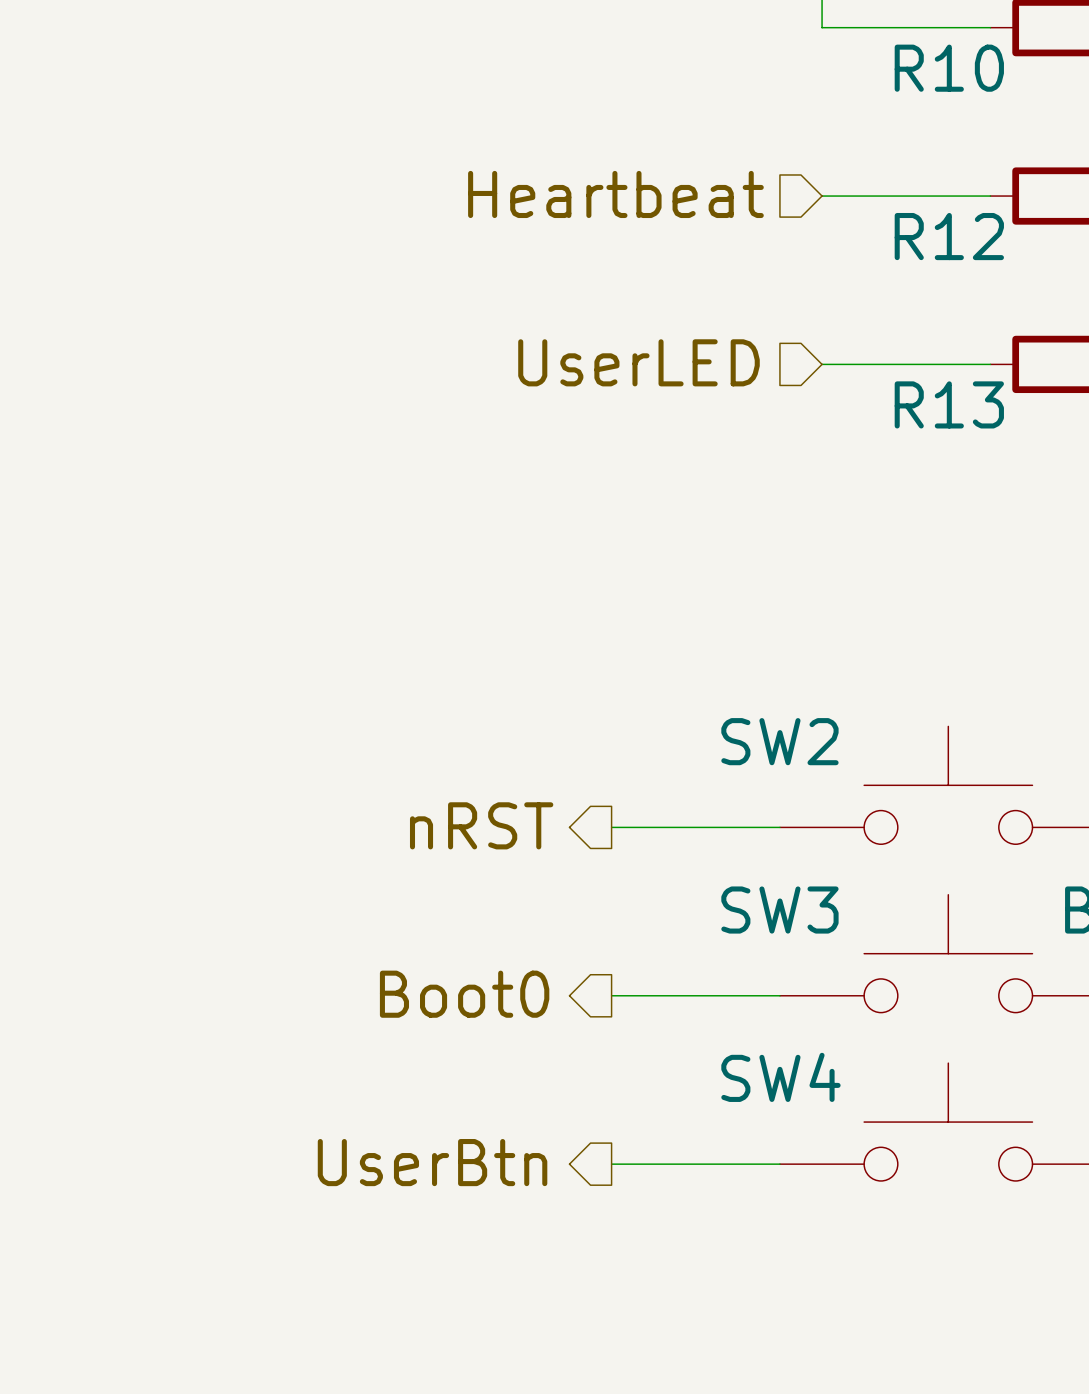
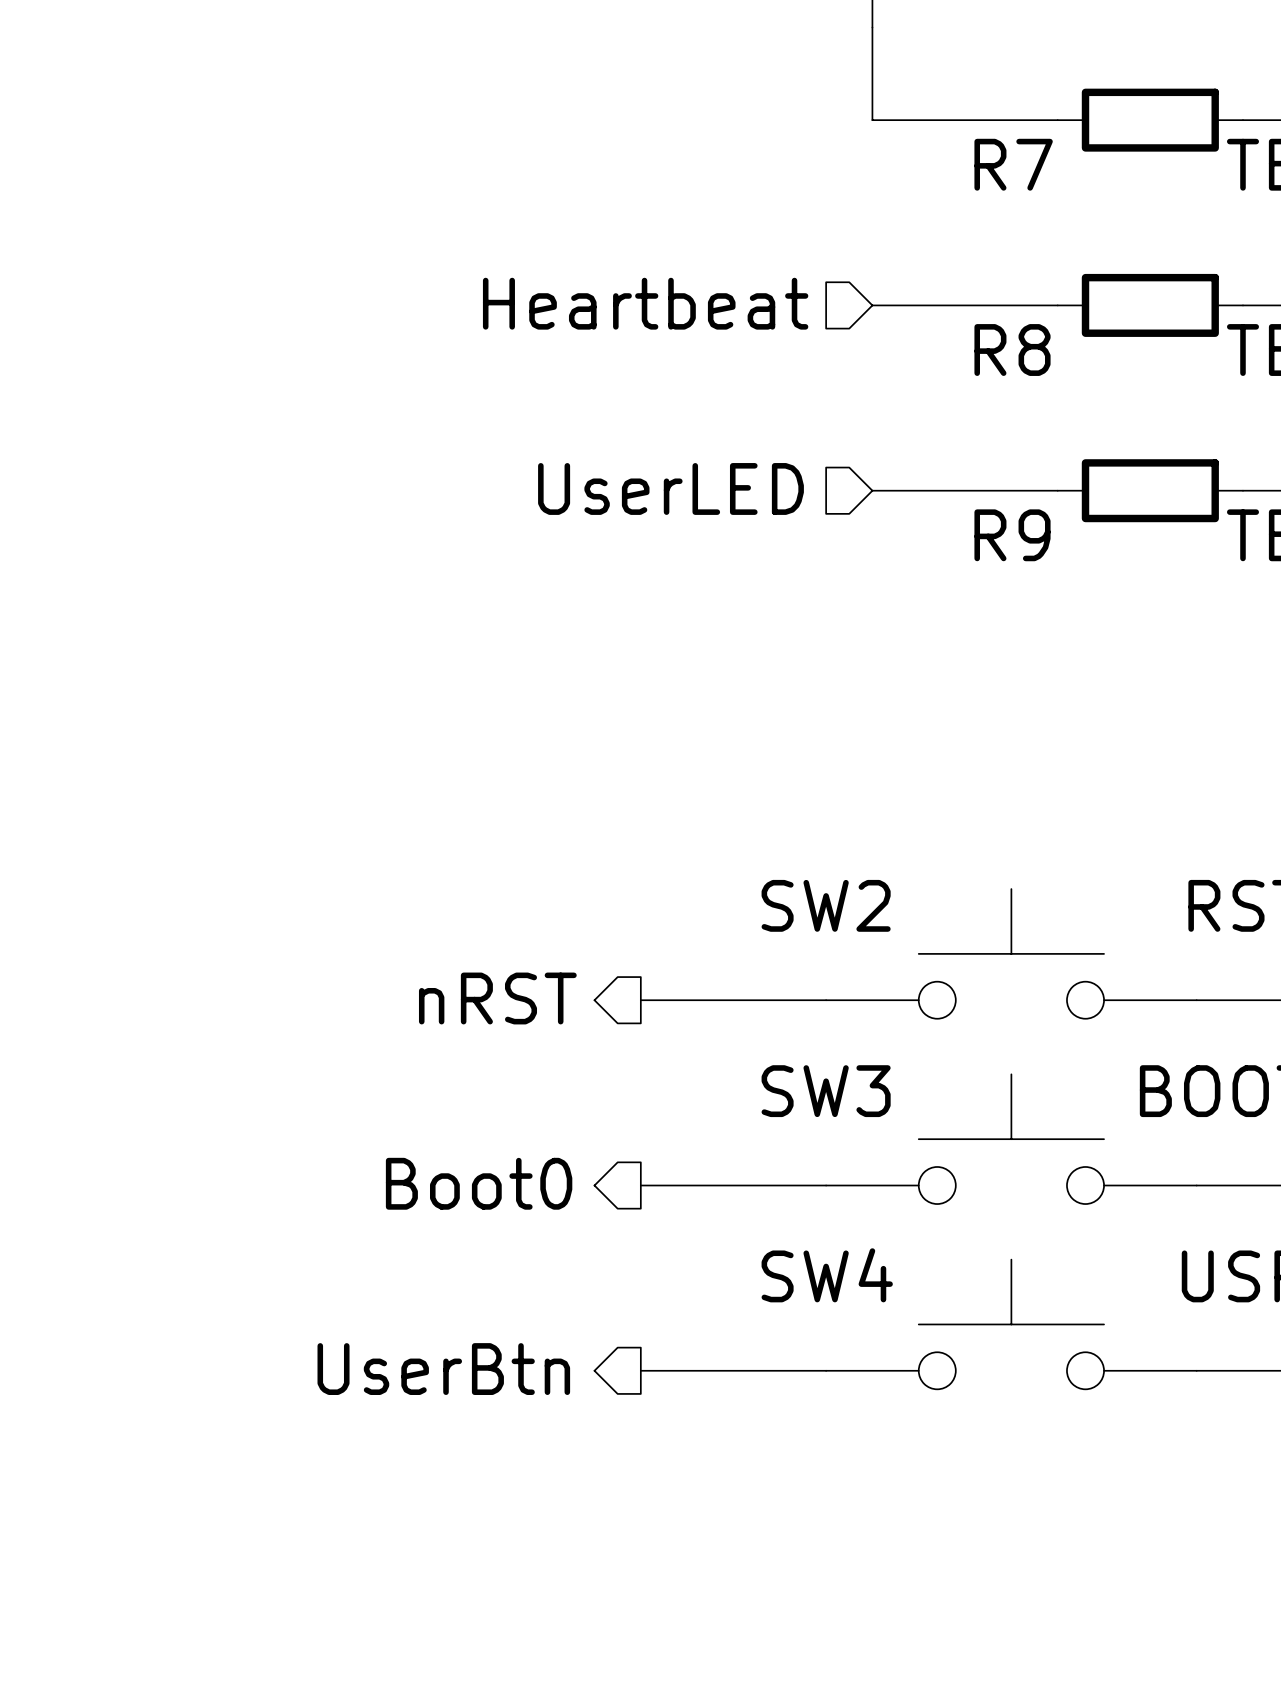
R10 name: R10 (949, 68) -> R7 (1013, 164)
R12 name: R12 (949, 236) -> R8 (1012, 350)
R13 name: R13 (949, 404) -> R9 (1012, 535)

